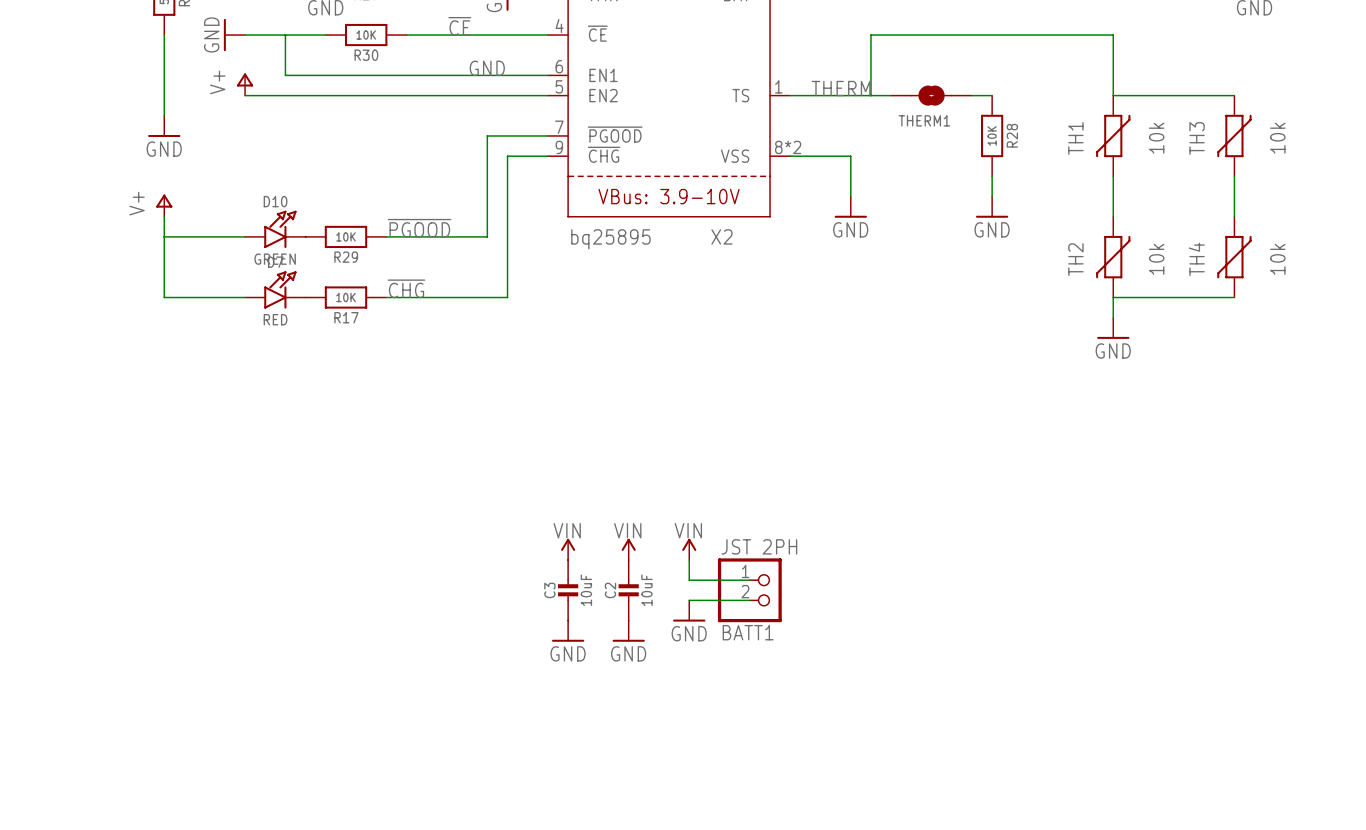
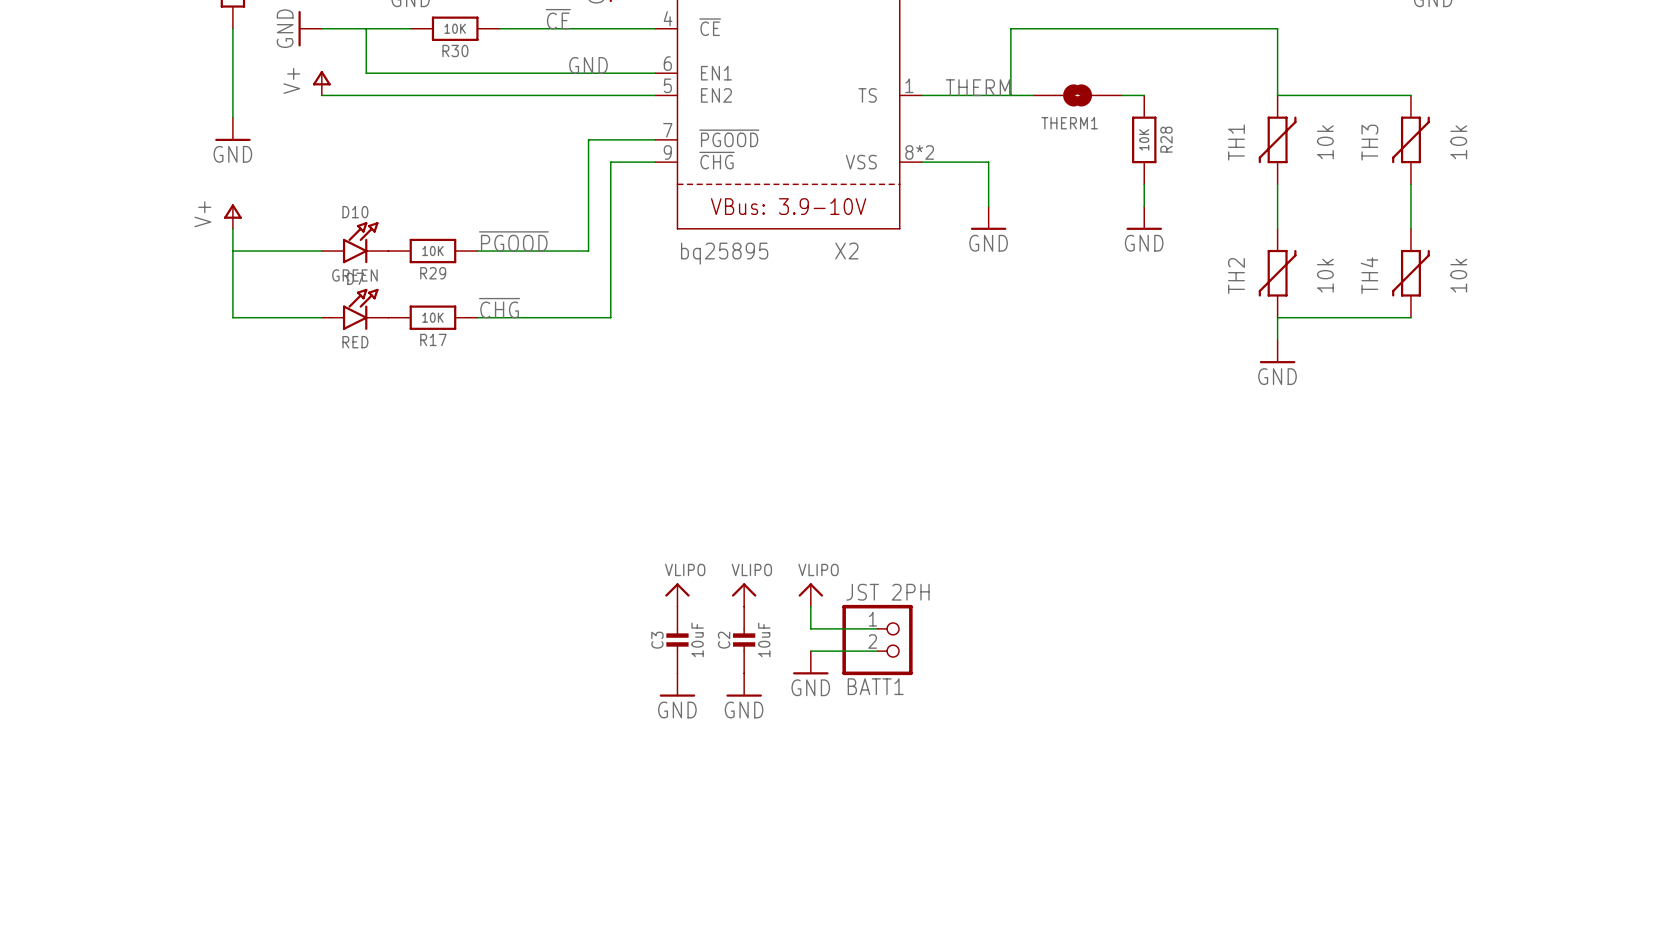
power symbol: VIN (568, 549) -> VLIPO (677, 594)
power symbol: VIN (628, 549) -> VLIPO (744, 594)
power symbol: VIN (689, 549) -> VLIPO (810, 594)

